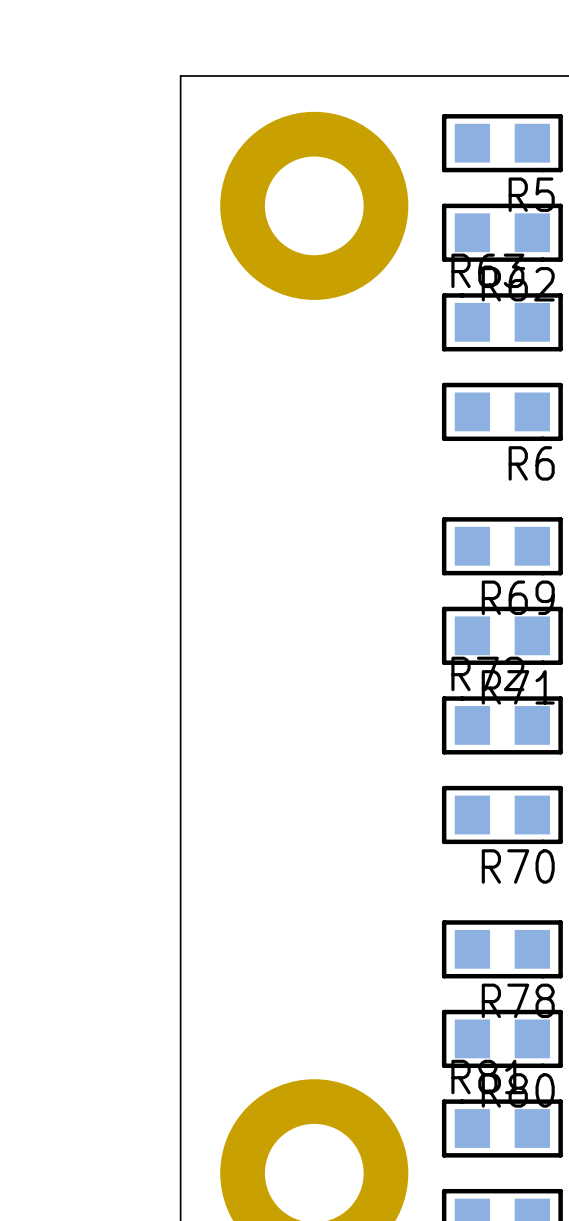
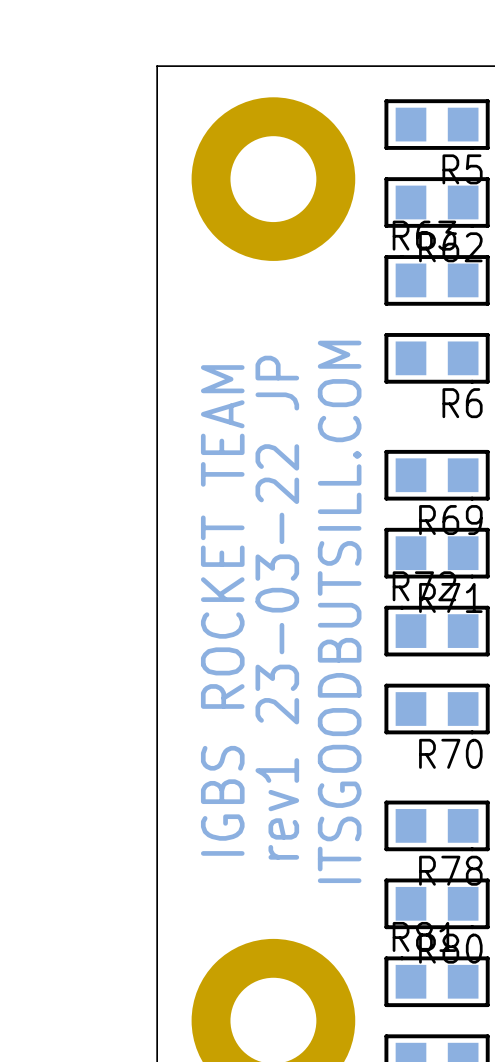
text: none -> rev1 23-03-22 JP (277, 607)
text: none -> IGBS ROCKET TEAM (222, 610)
text: none -> ITSGOODBUTSILL.COM (339, 611)

